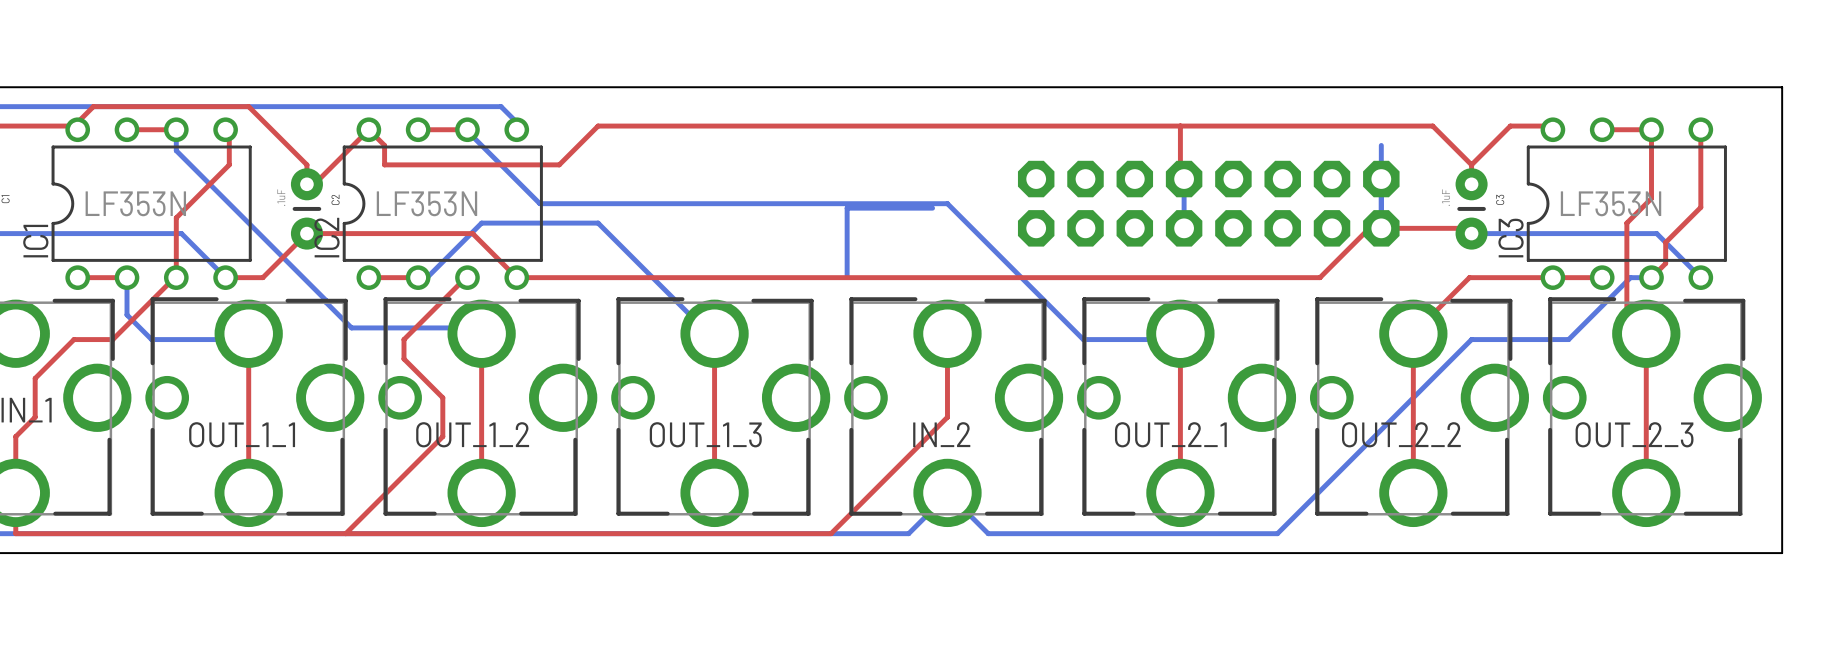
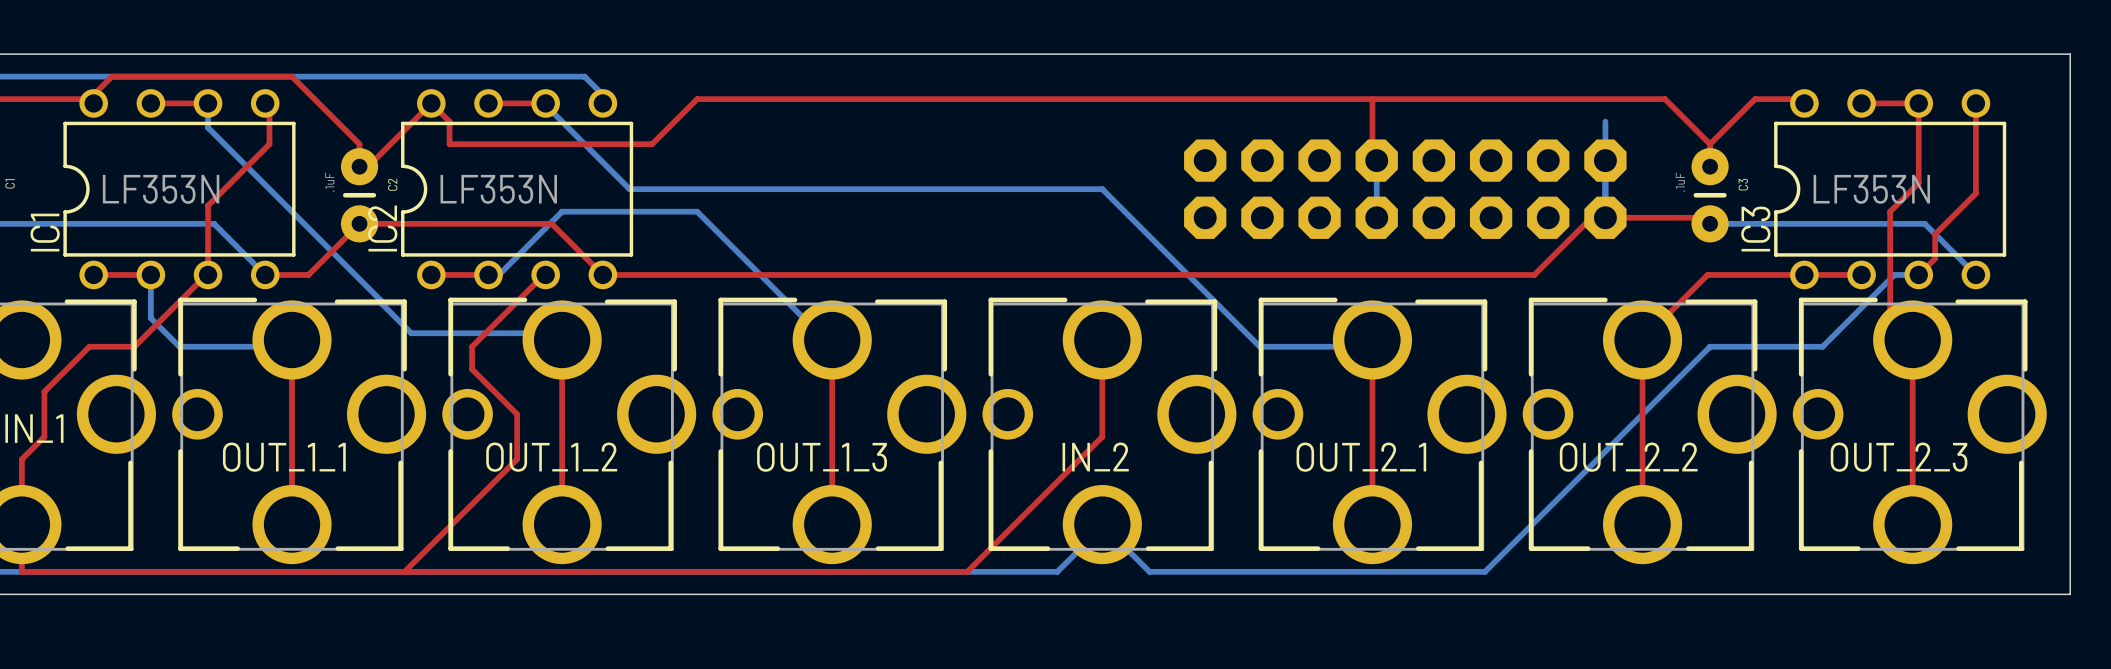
bottom track: (932, 208) (847, 208) (847, 276) -> none

